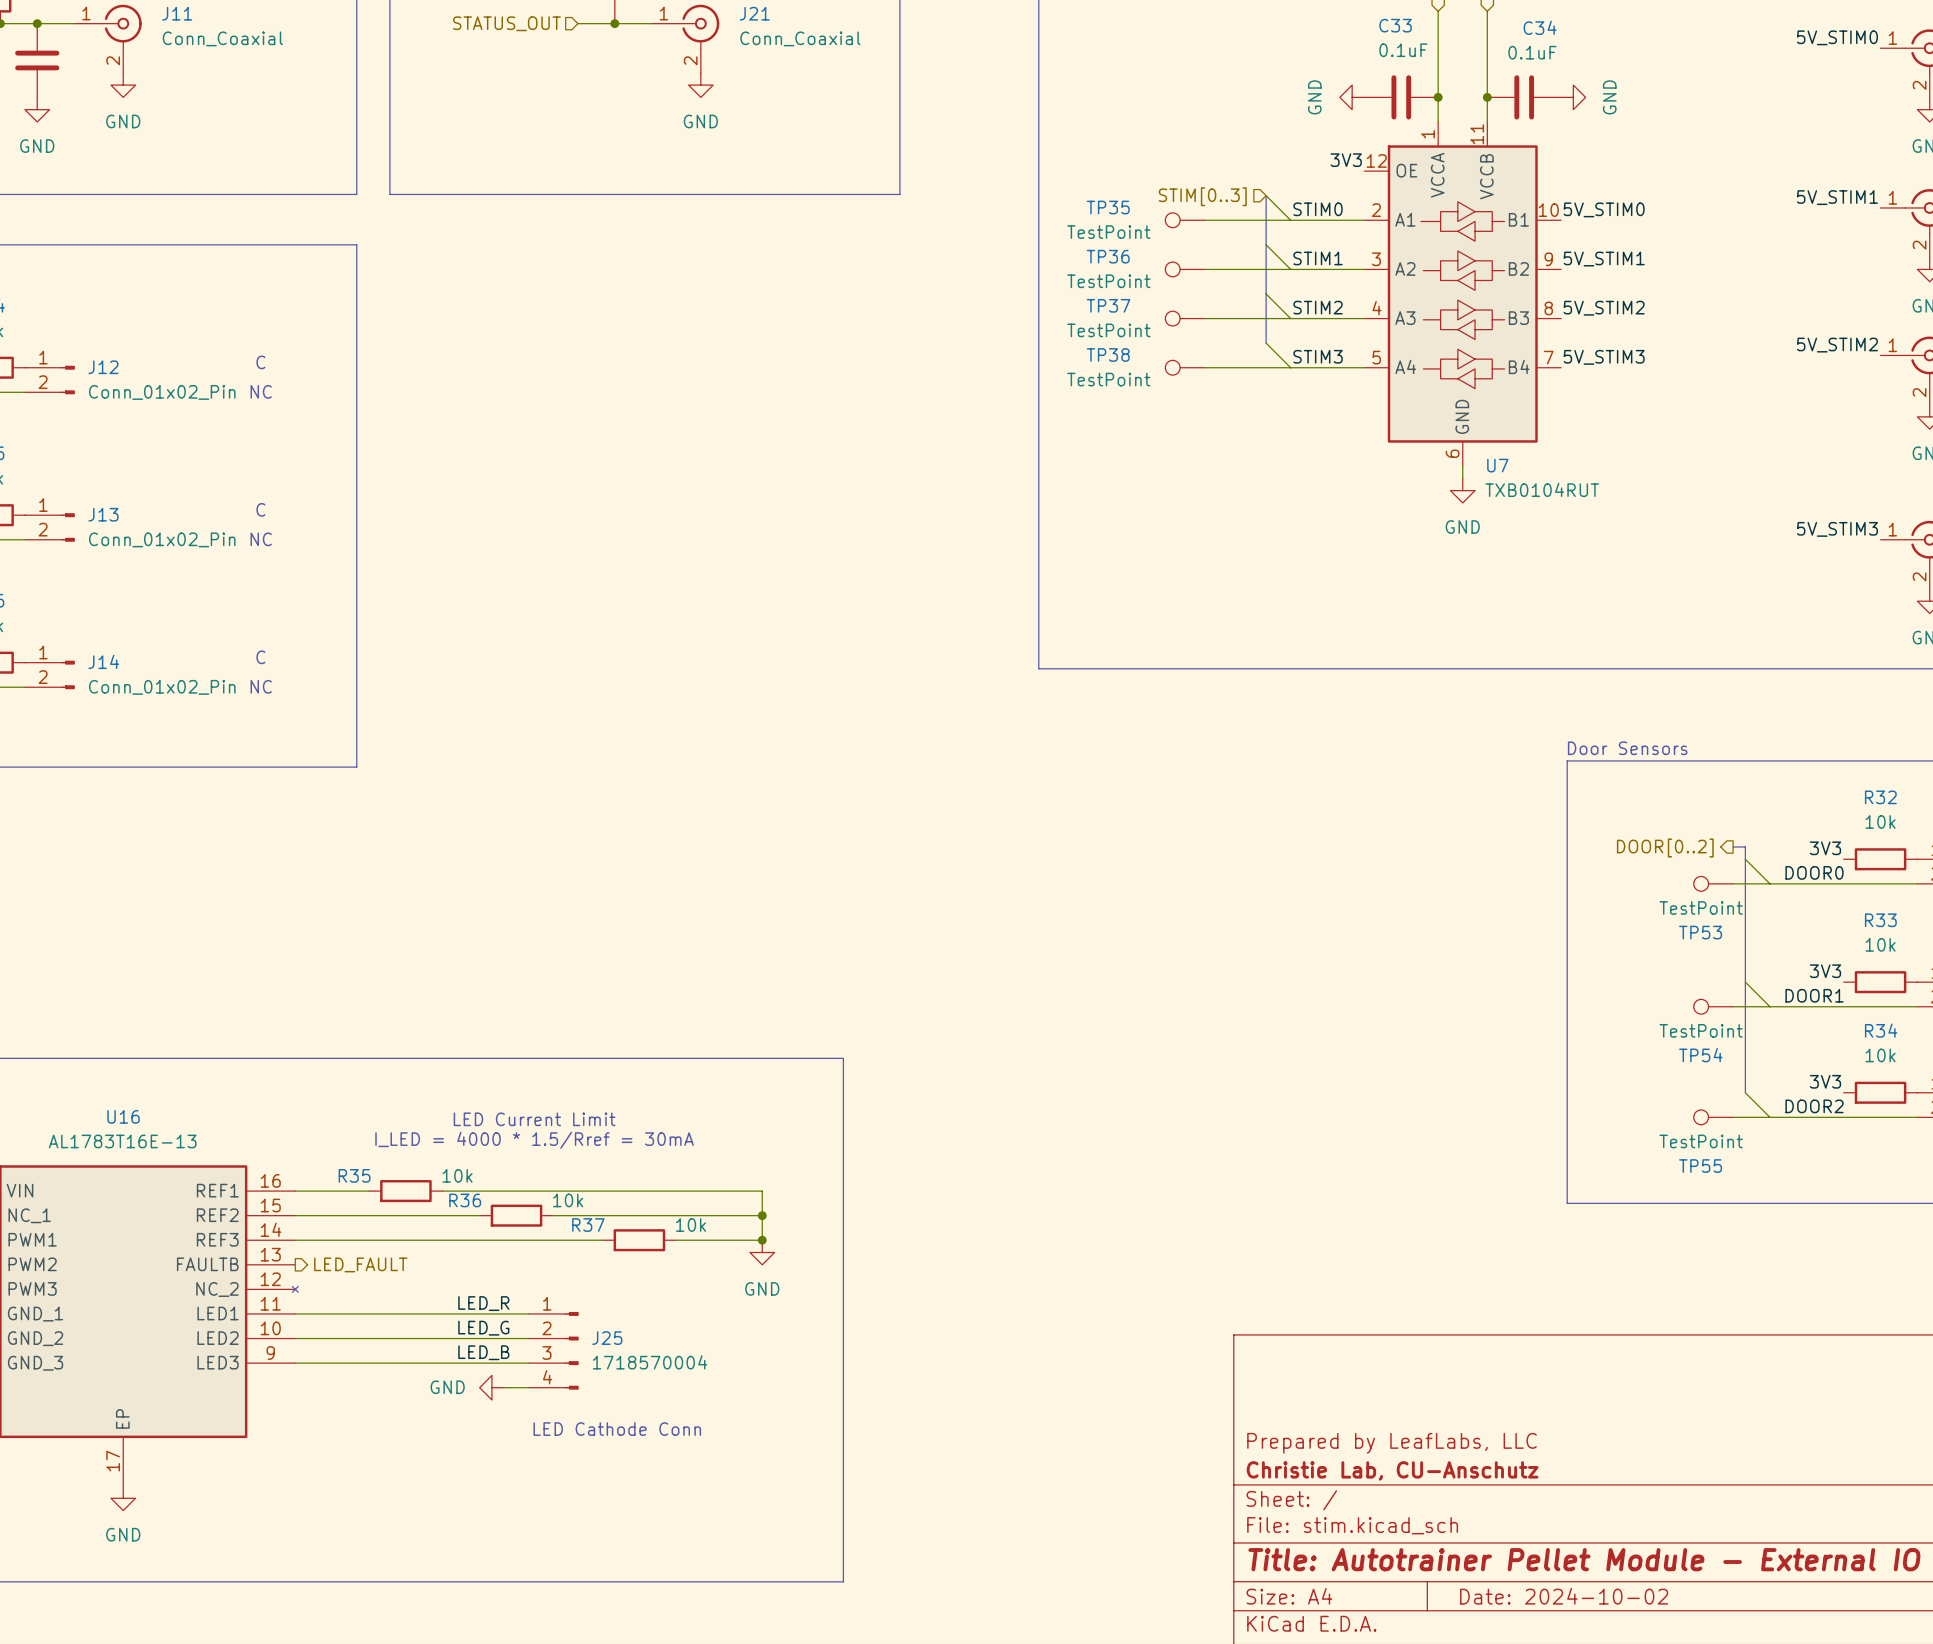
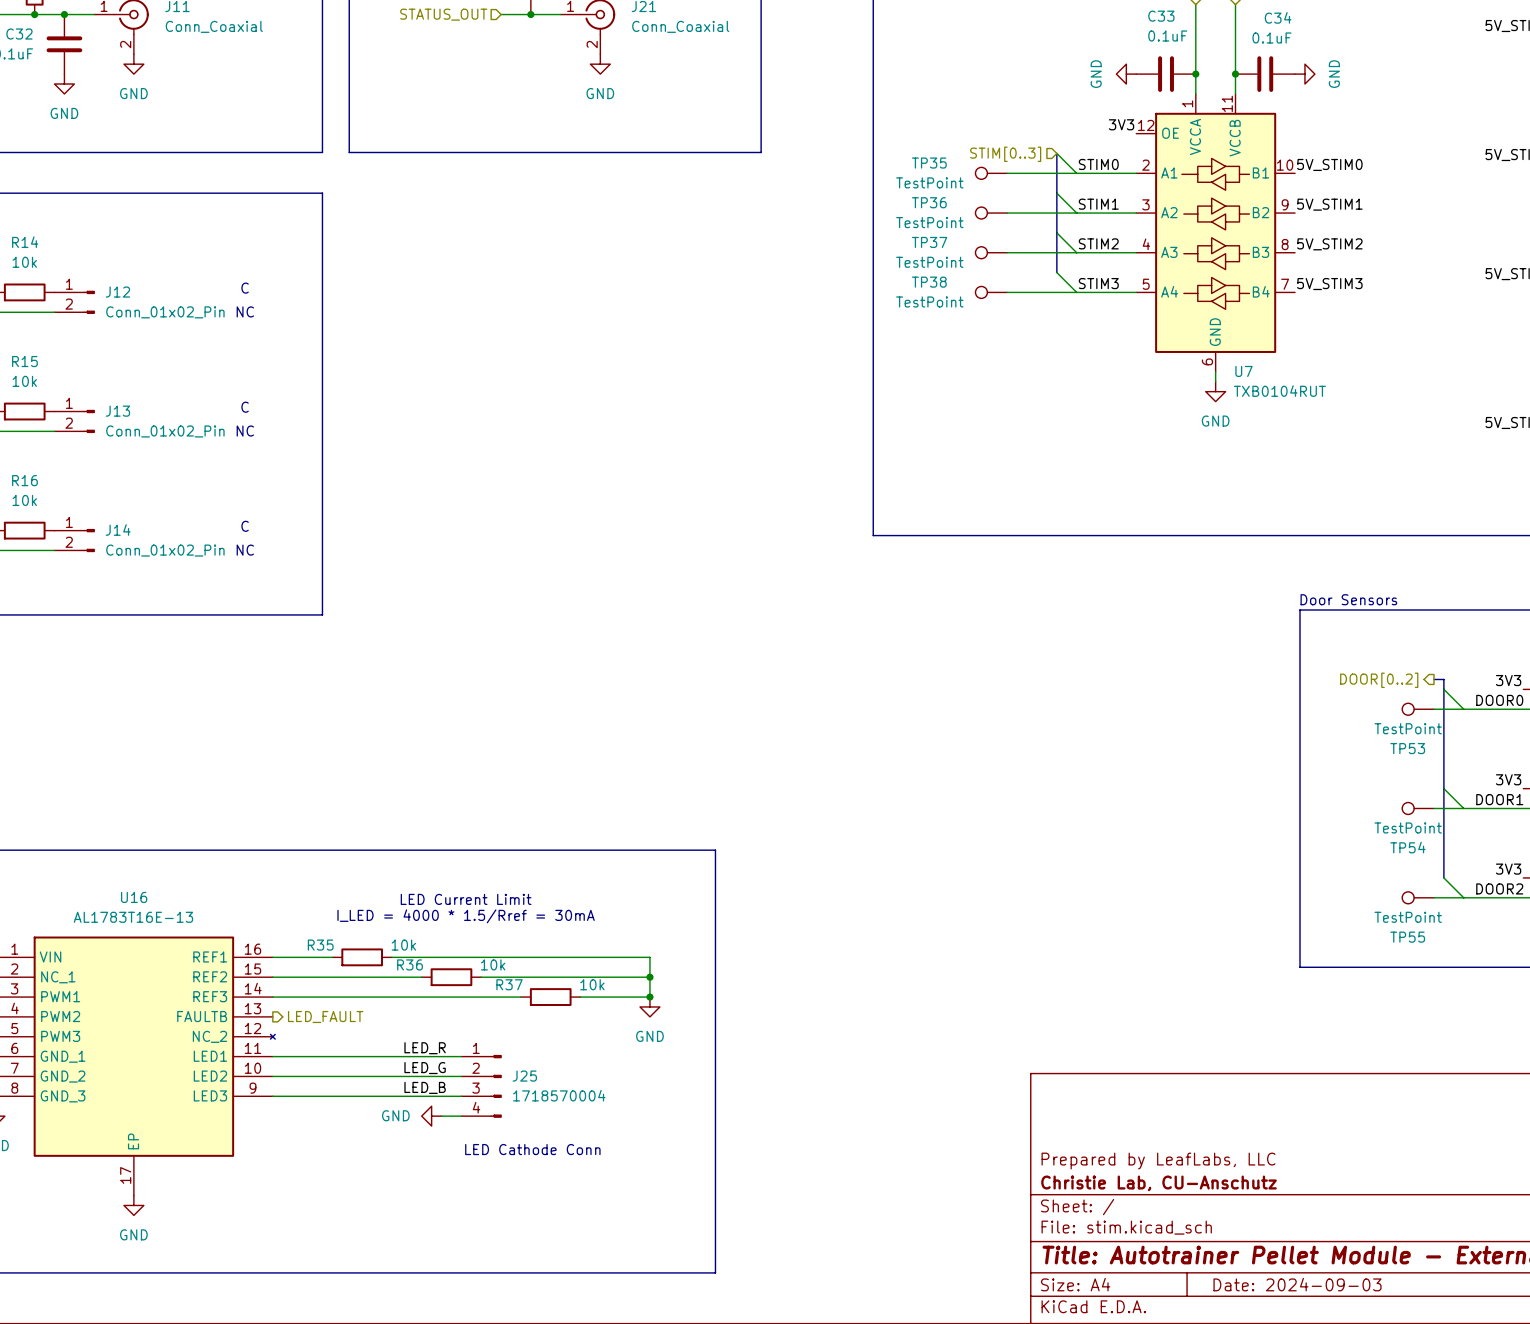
title block: Date: 2024-10-02 (1564, 1596) -> Date: 2024-09-03 (1297, 1284)

